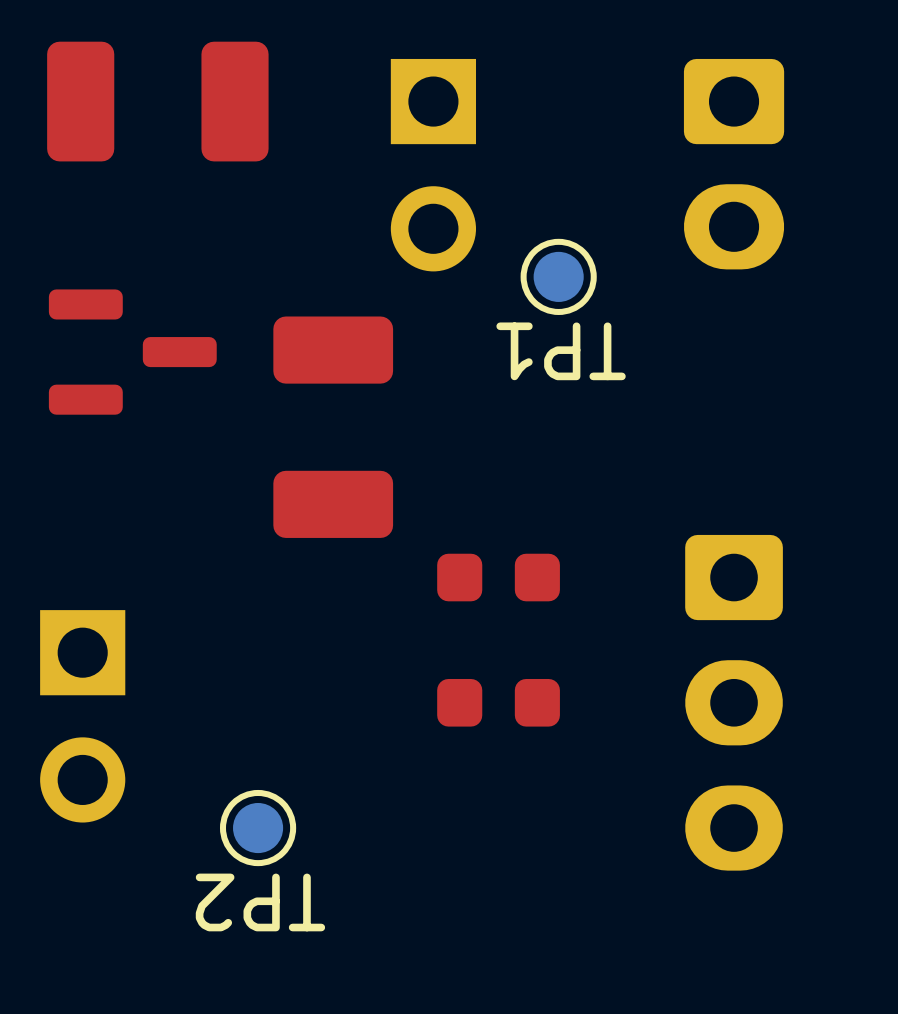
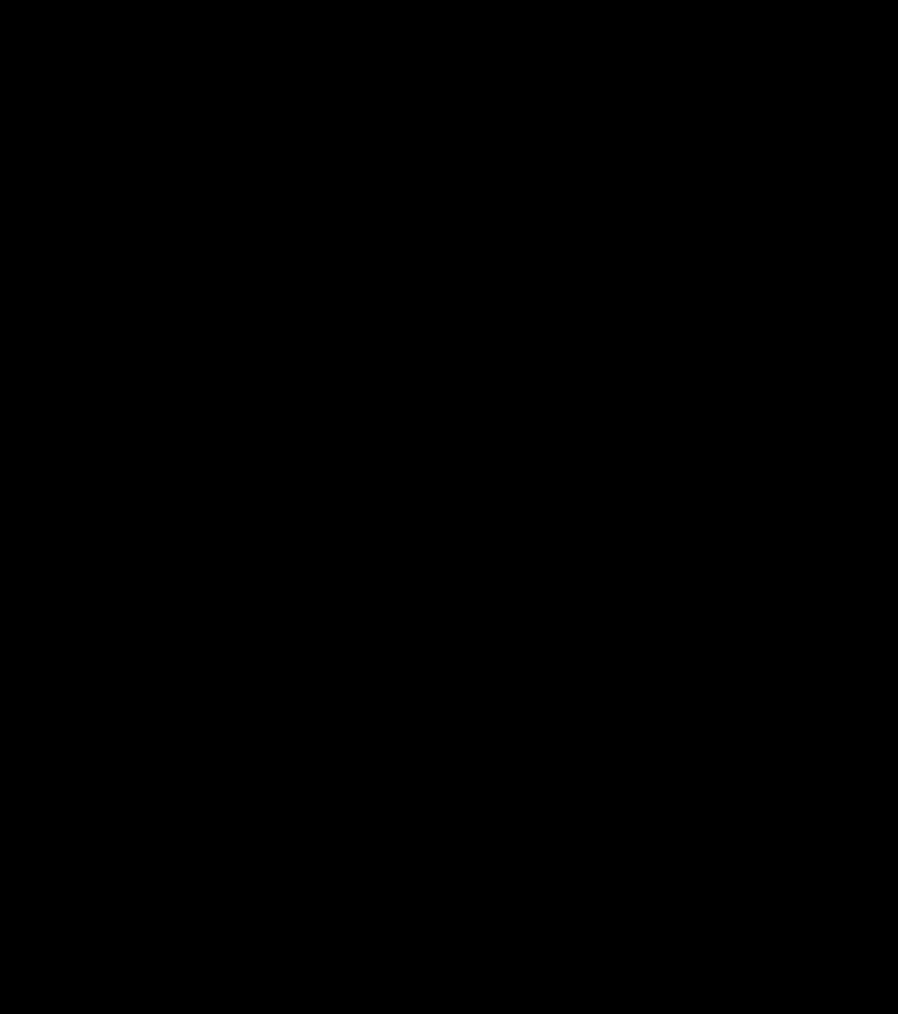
part: (157, 101) -> none
part: (734, 164) -> none
part: (433, 165) -> none
TP1: (558, 276) -> none
part: (132, 352) -> none
part: (333, 427) -> none
part: (498, 577) -> none
part: (498, 702) -> none
part: (734, 702) -> none
part: (82, 716) -> none
TP2: (258, 828) -> none

